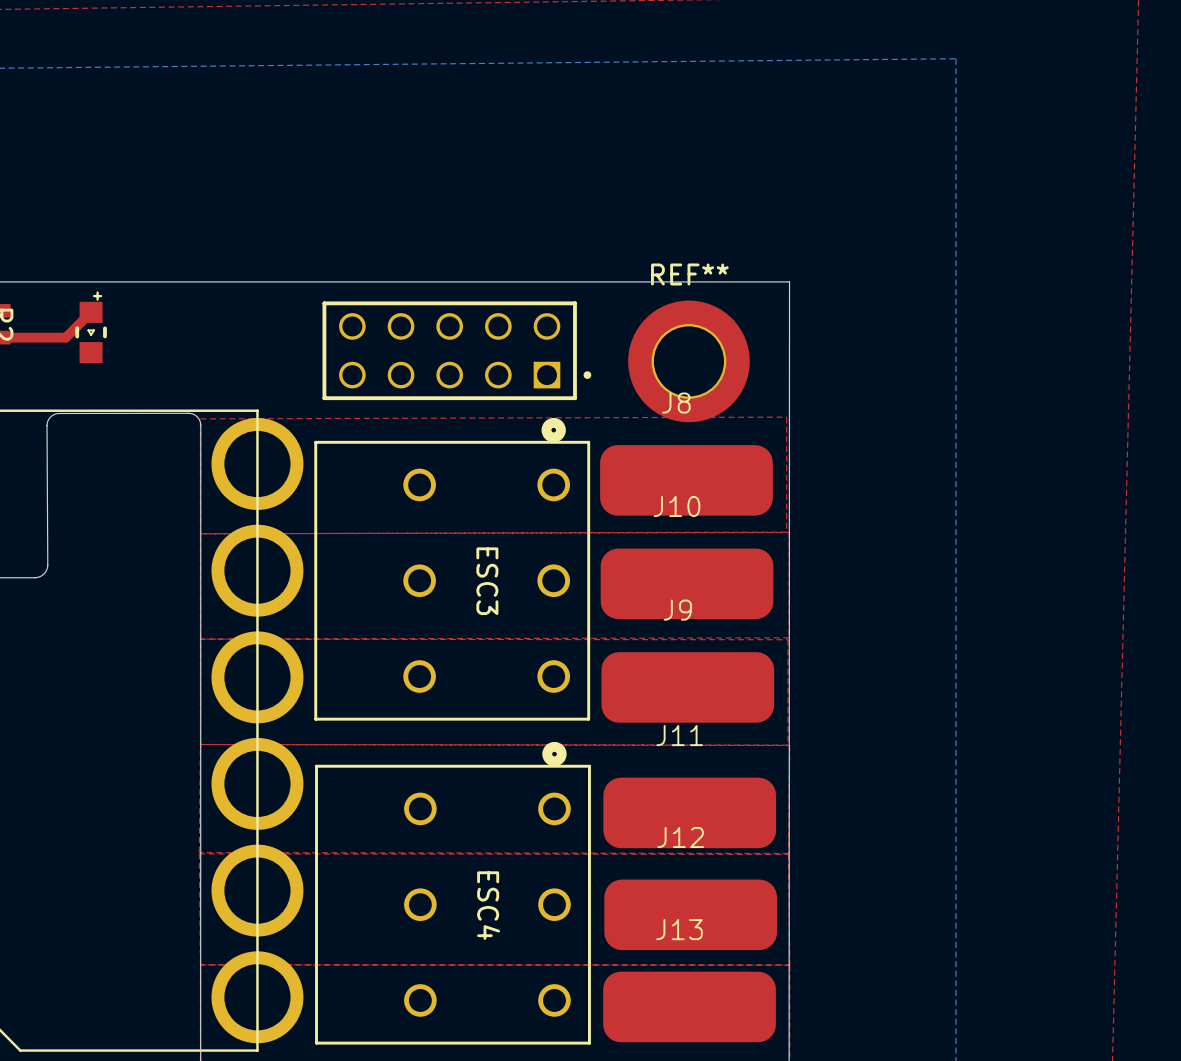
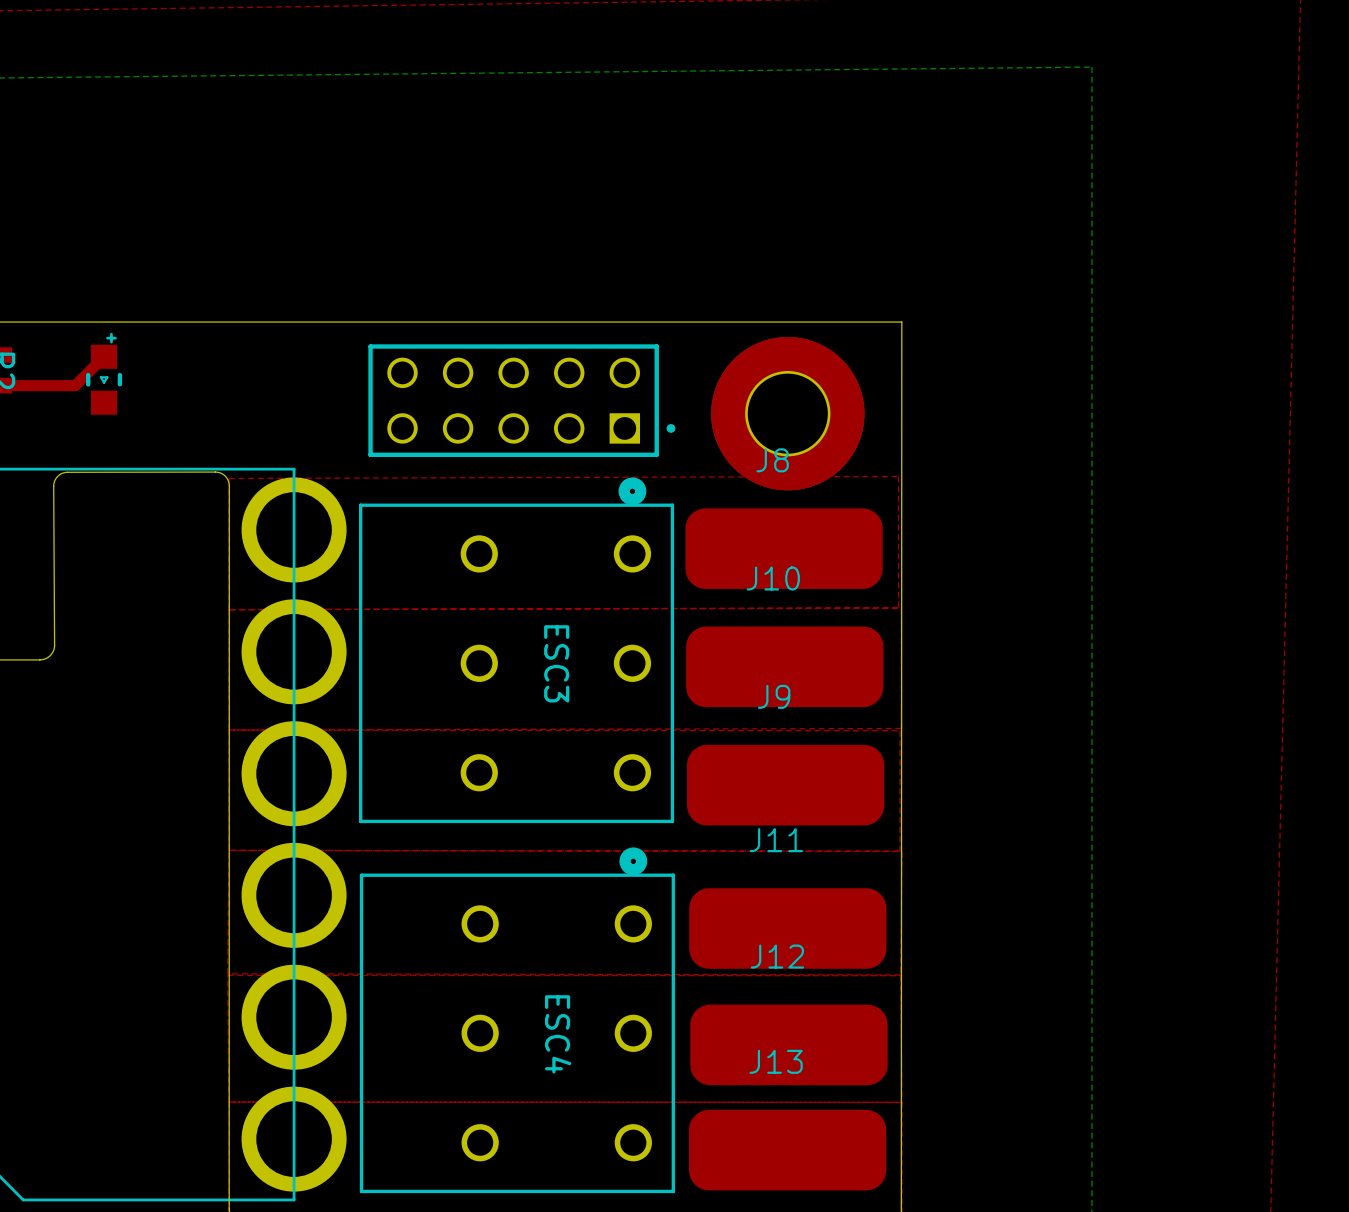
REF**: (688, 361) -> none
part: none -> (787, 413)
part: none -> (787, 413)

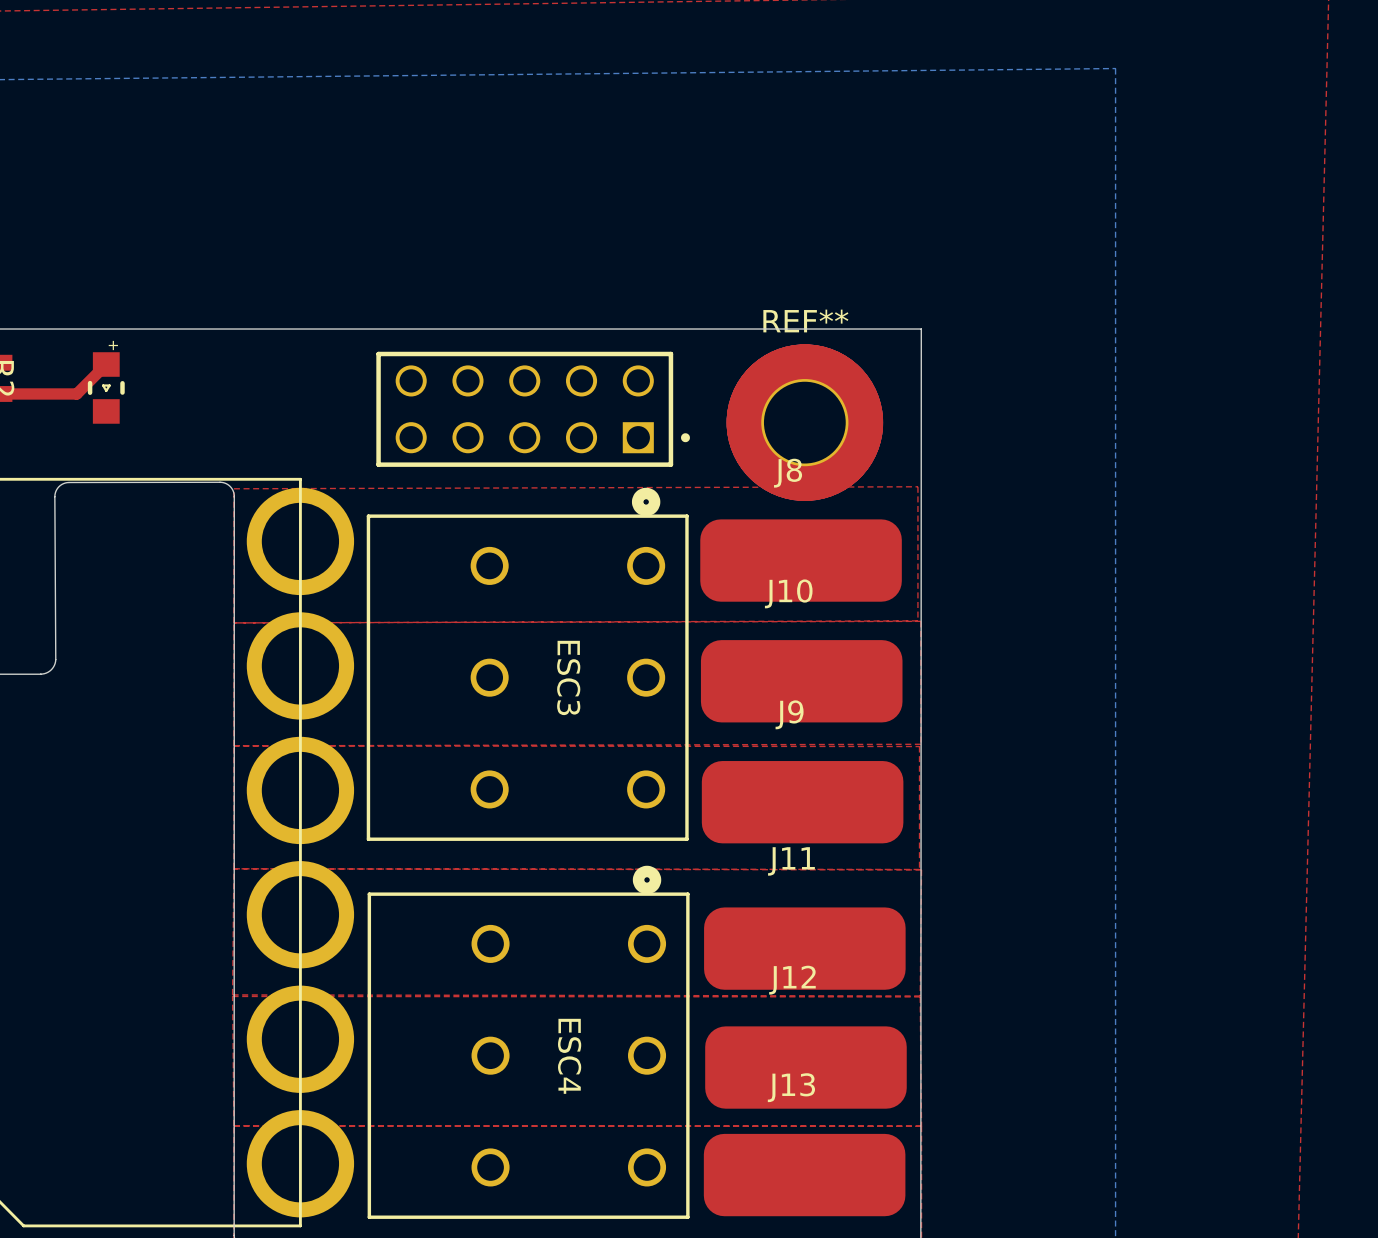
REF** name: none -> REF** (805, 320)

